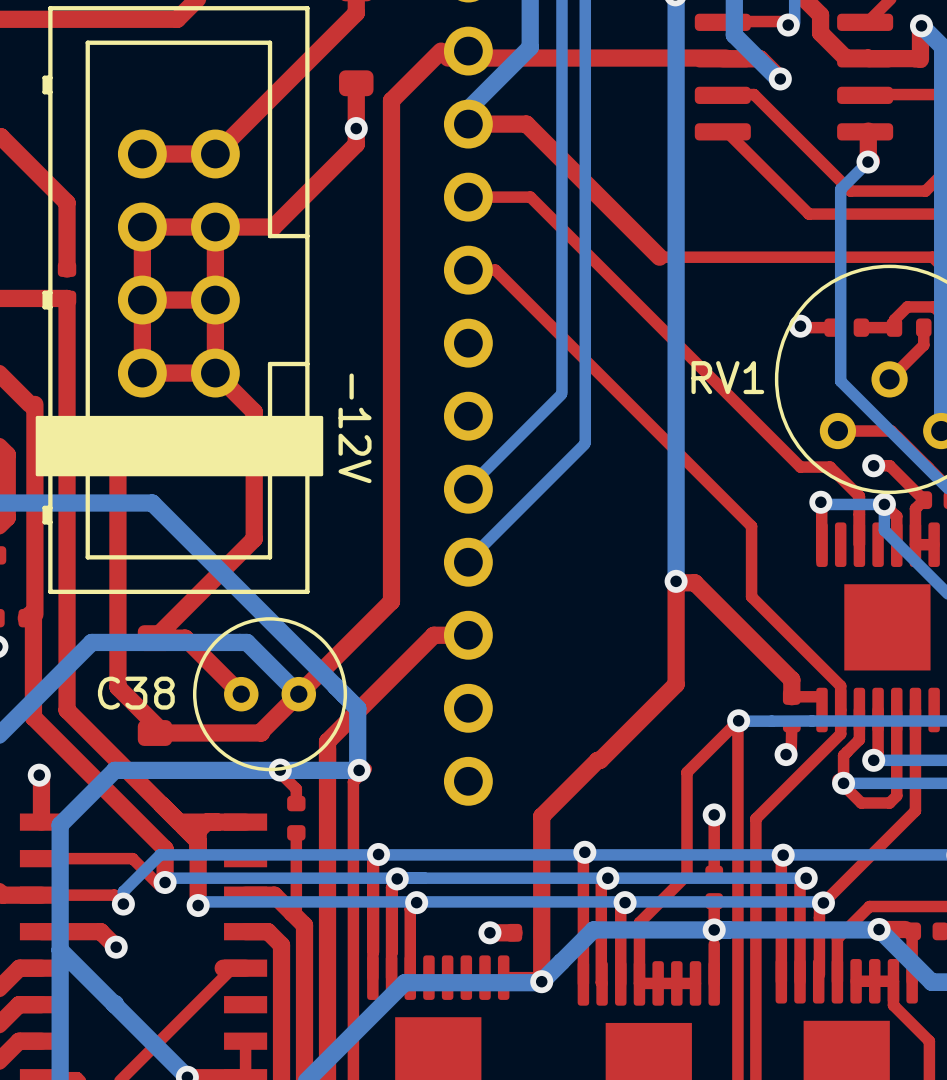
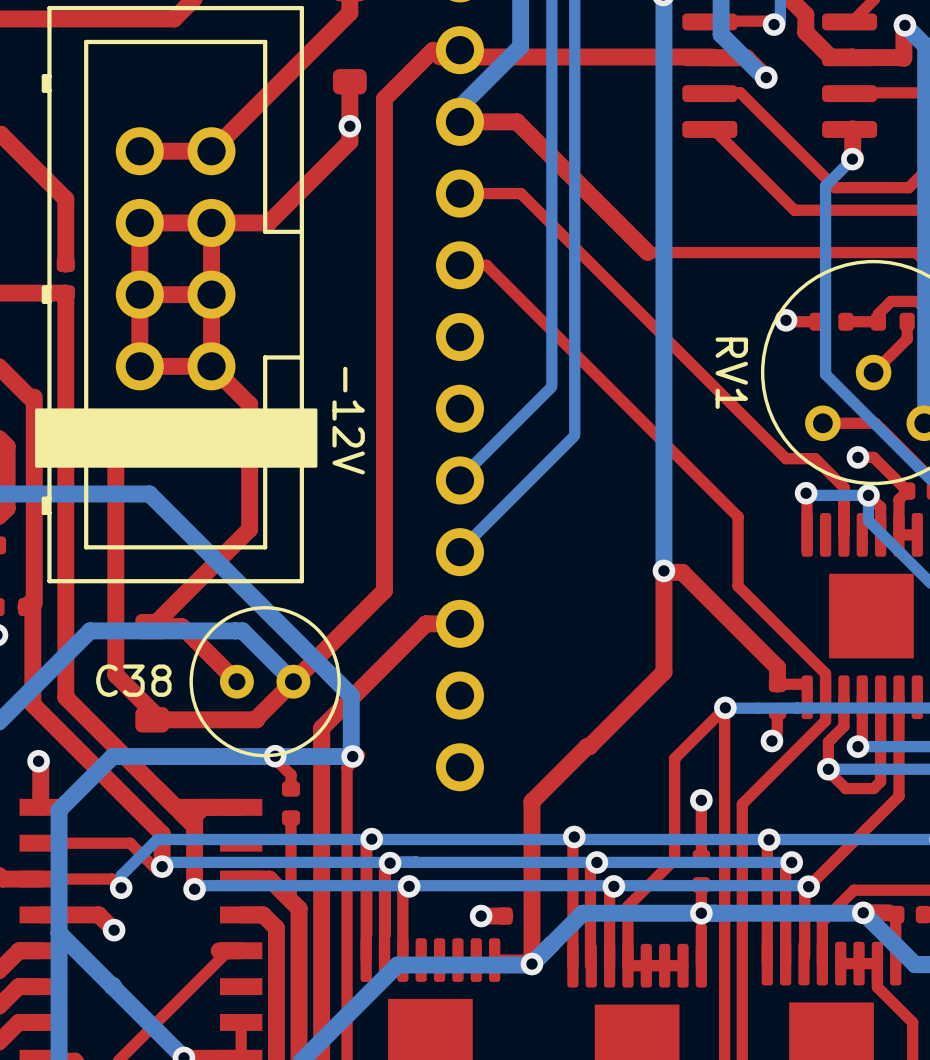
RV1 name rotation: 0° (727, 377) -> 90° clockwise (731, 373)

